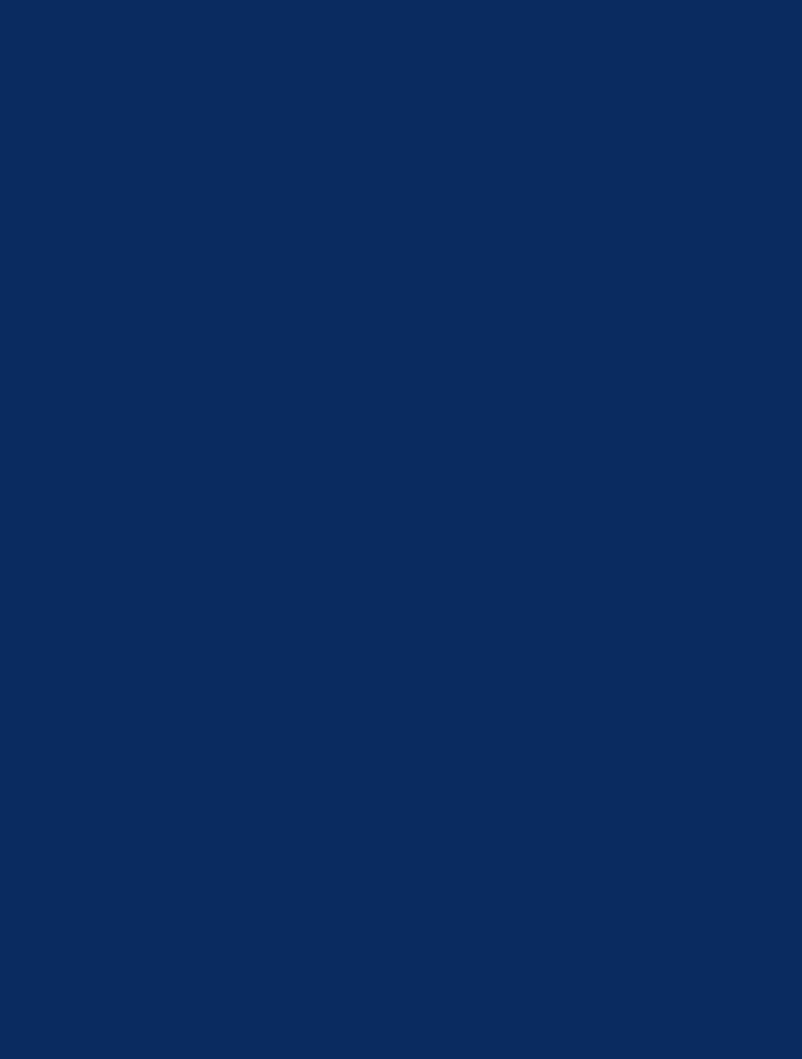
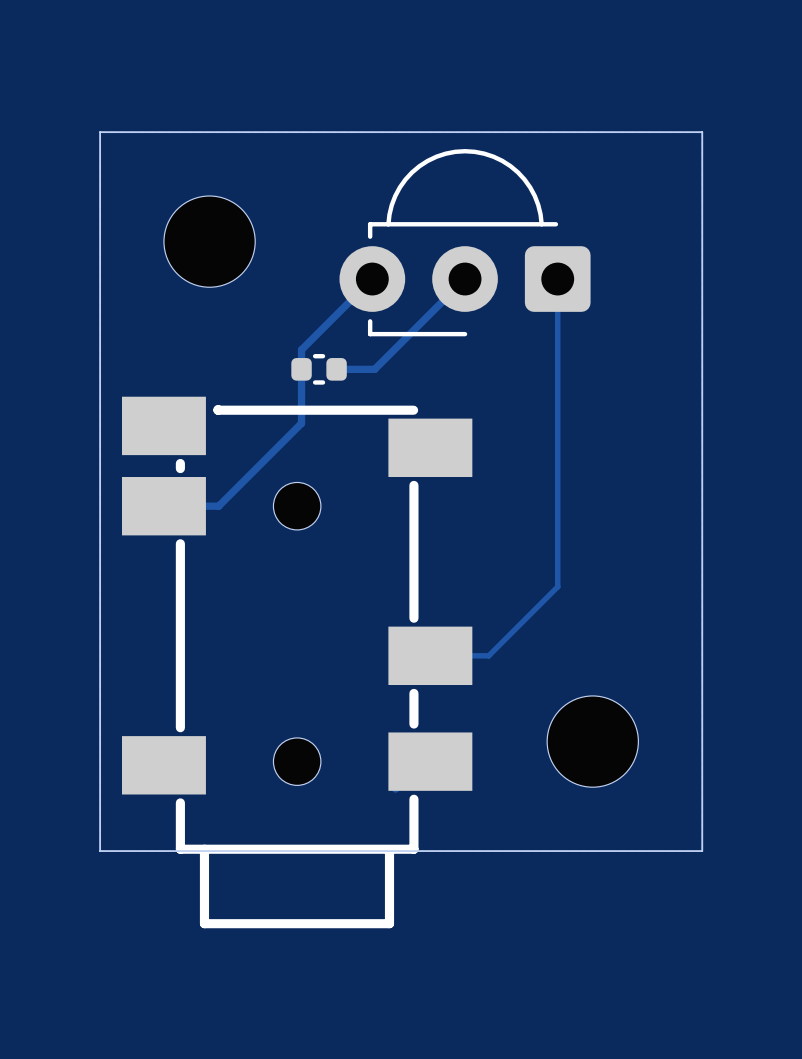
board edge: none -> (100, 132) (702, 132) (702, 851) (100, 851) (100, 132)
part: none -> (209, 241)
part: none -> (465, 242)
track: none -> (372, 279) (301, 349) (301, 423) (218, 506) (163, 506)
track: none -> (465, 279) (374, 369) (336, 369)
track: none -> (557, 279) (557, 586) (488, 655) (430, 655)
part: none -> (319, 369)
part: none -> (297, 662)
part: none -> (592, 741)

